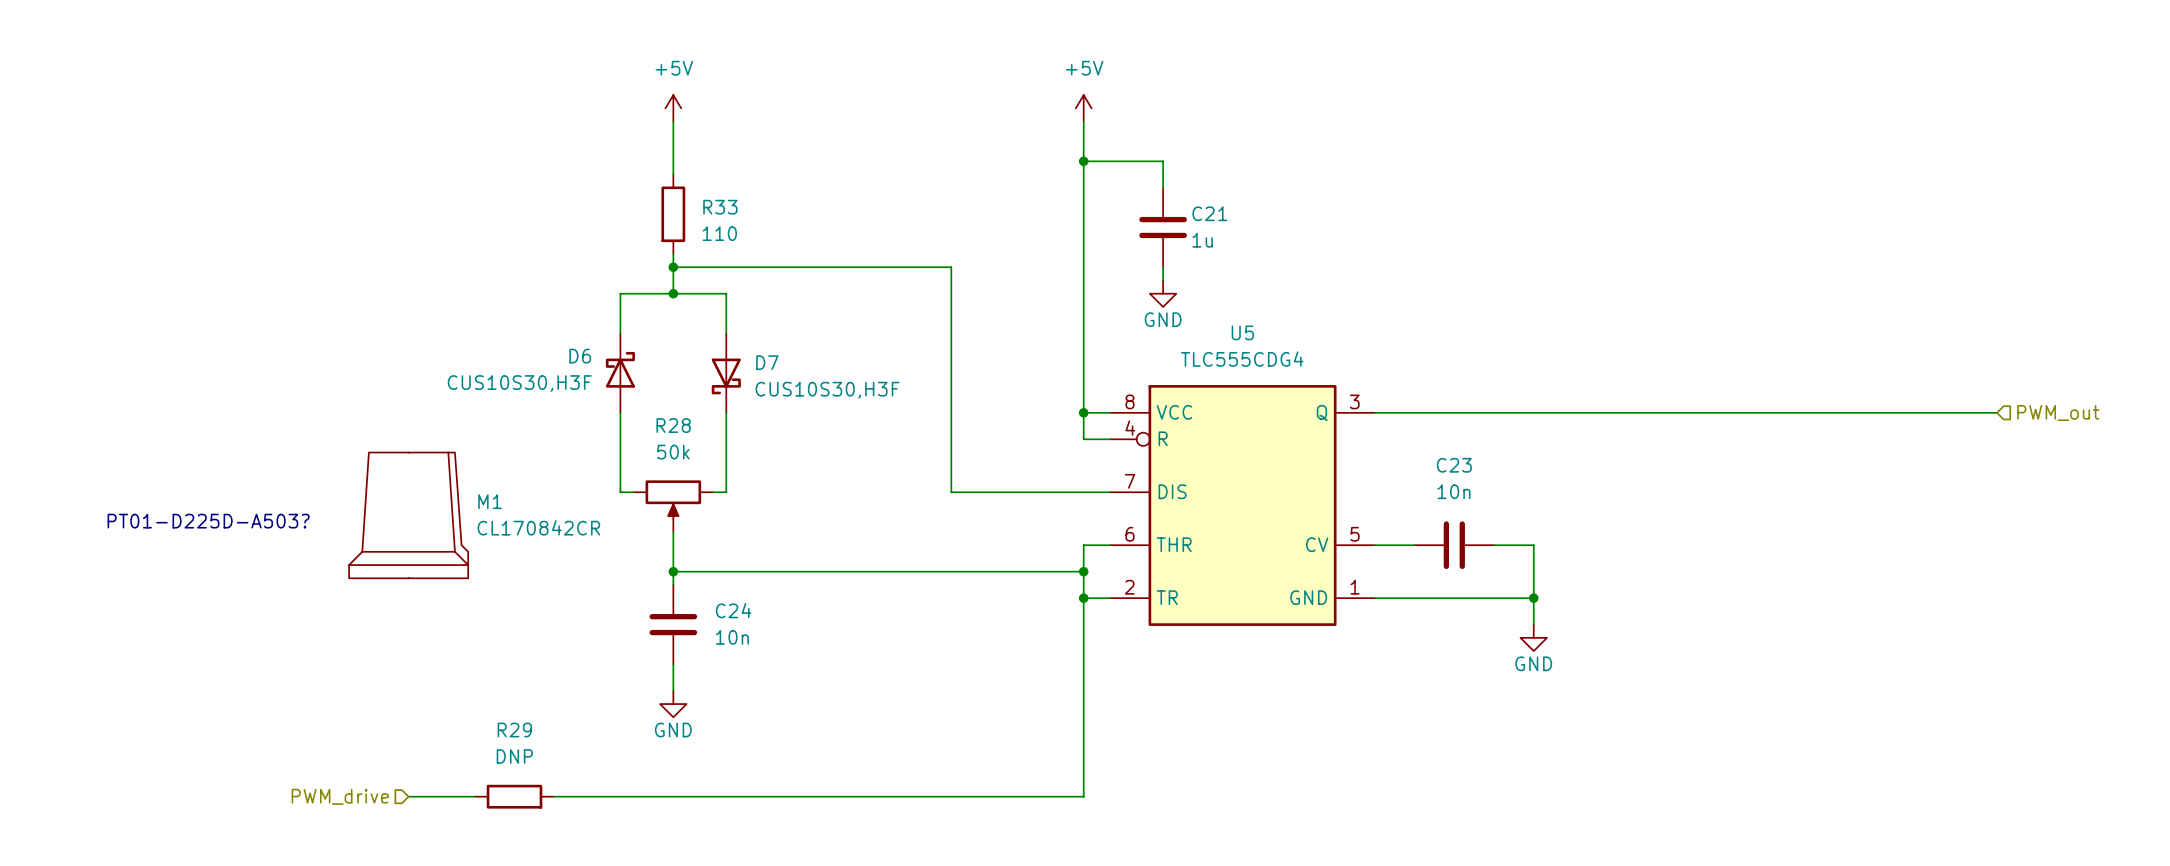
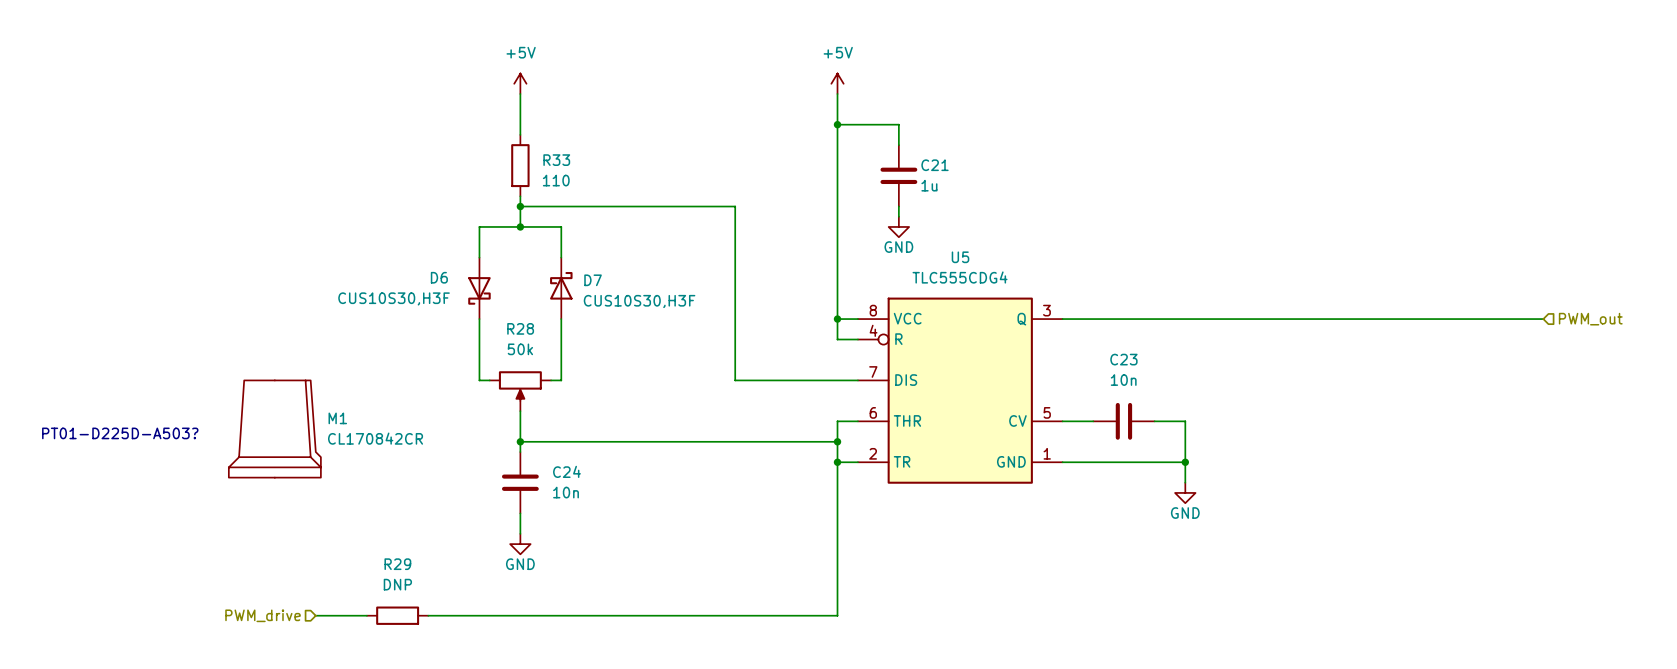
D6 rotation: 0° (620, 369) -> 180° (479, 290)
D7 rotation: 0° (726, 376) -> 180° (561, 285)
M1 position: (408, 515) -> (274, 429)
text position: PT01-D225D-A503? (208, 521) -> PT01-D225D-A503? (120, 433)

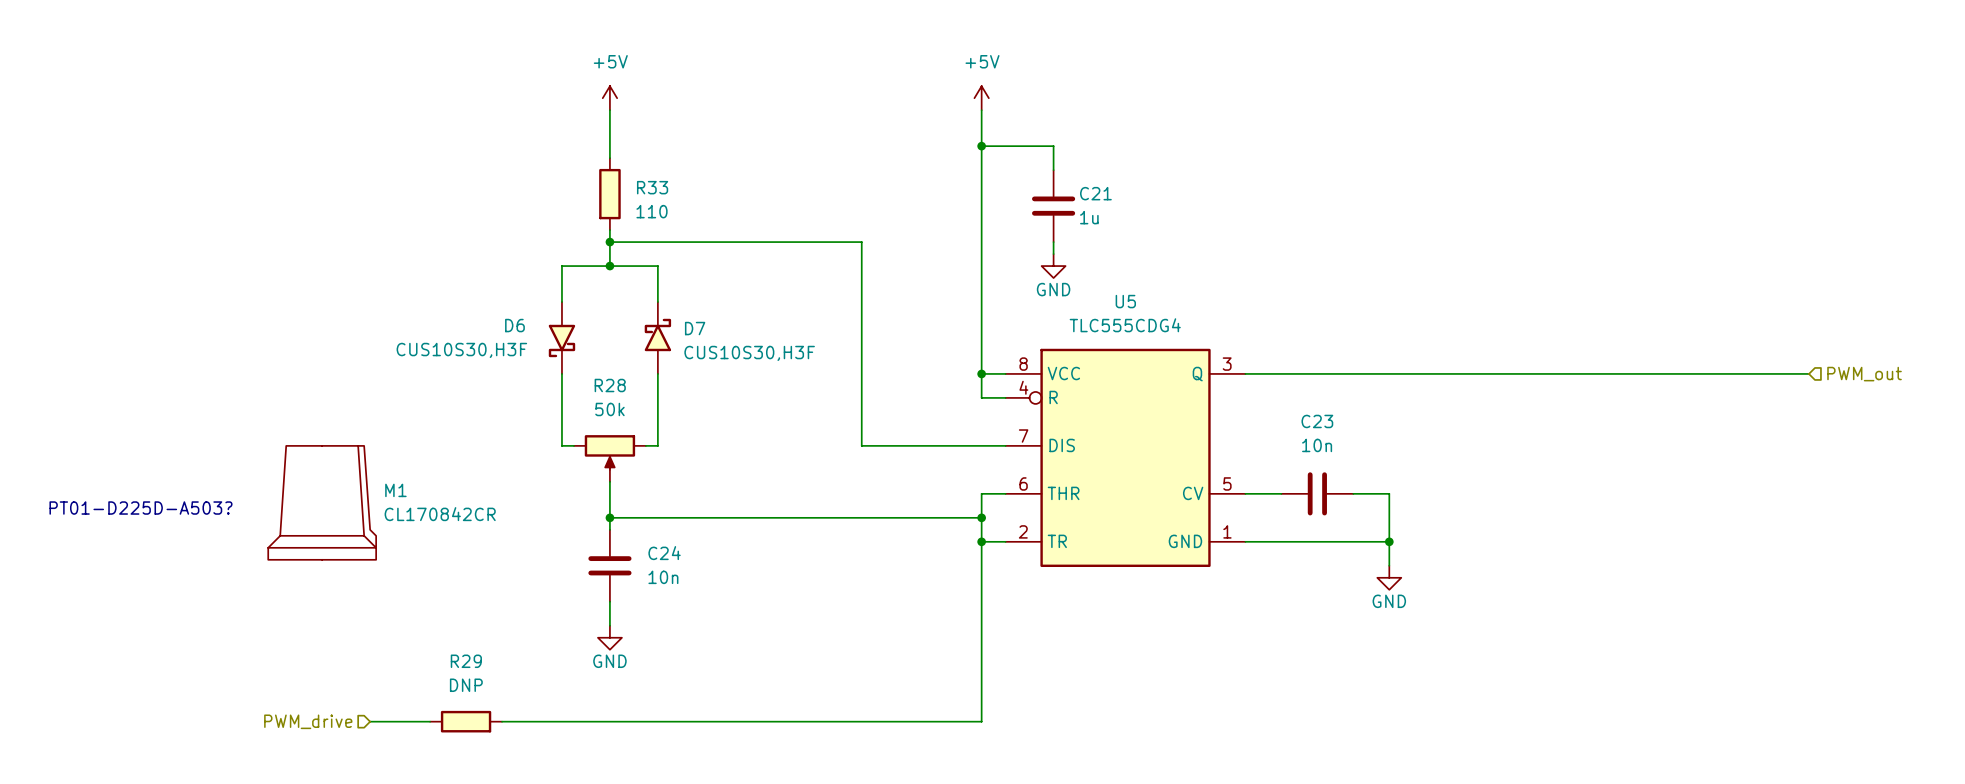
R33 symbol: [511, 134, 530, 197] -> [599, 158, 621, 231]
D6 symbol: [468, 257, 491, 320] -> [548, 302, 576, 374]
D7 symbol: [550, 257, 573, 320] -> [644, 302, 672, 374]
R28 symbol: [489, 371, 552, 412] -> [573, 435, 646, 482]
R29 symbol: [366, 606, 429, 625] -> [430, 710, 503, 733]

